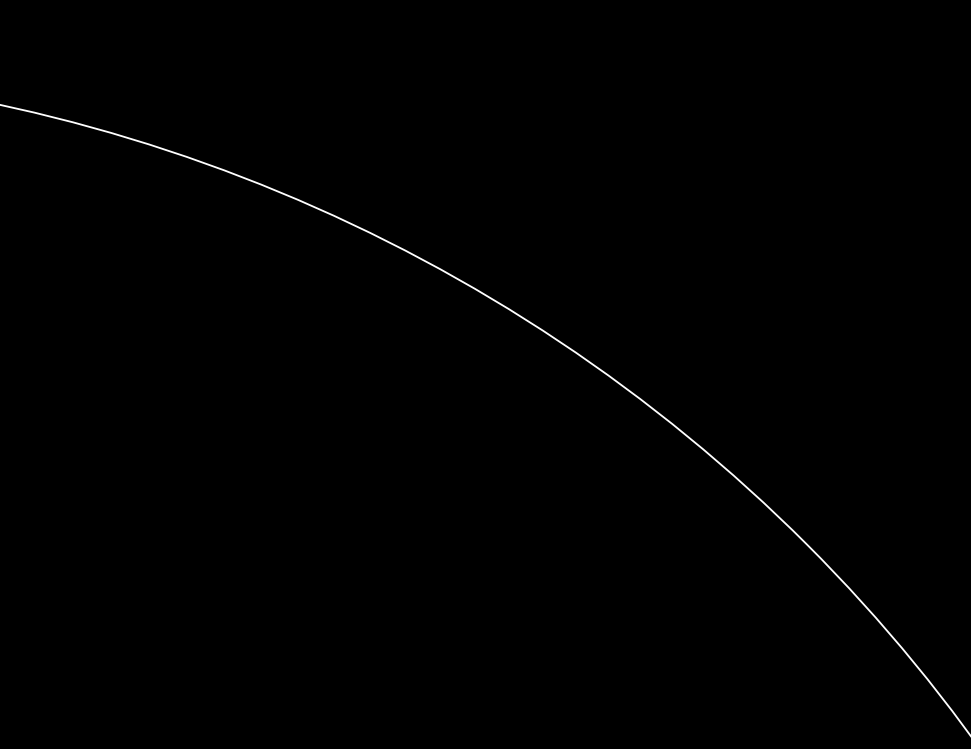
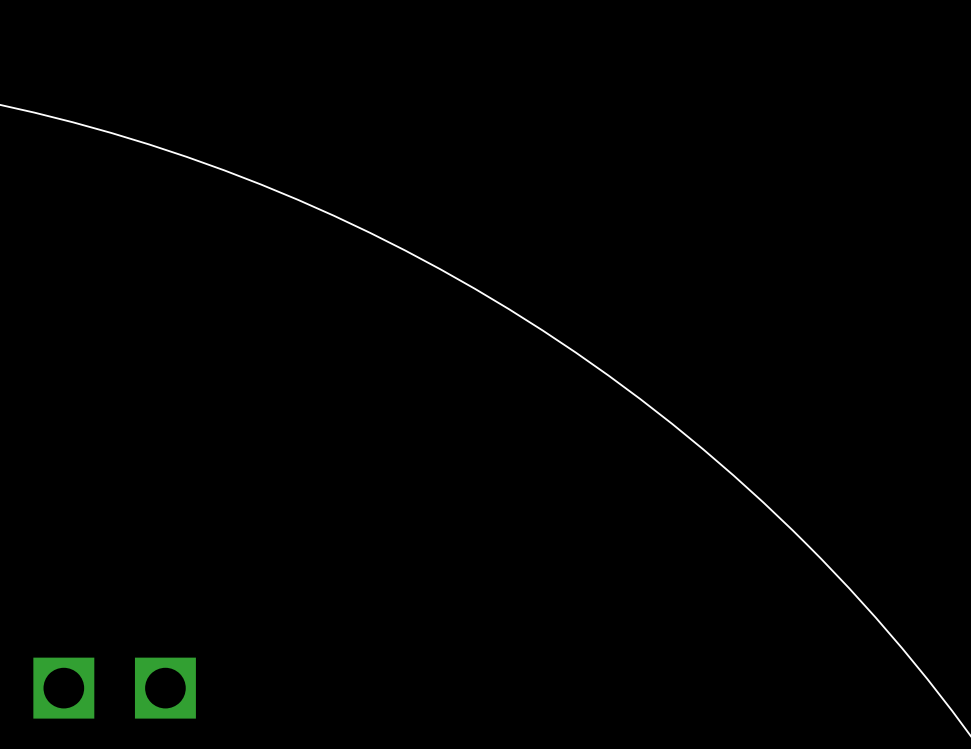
part: none -> (114, 688)

